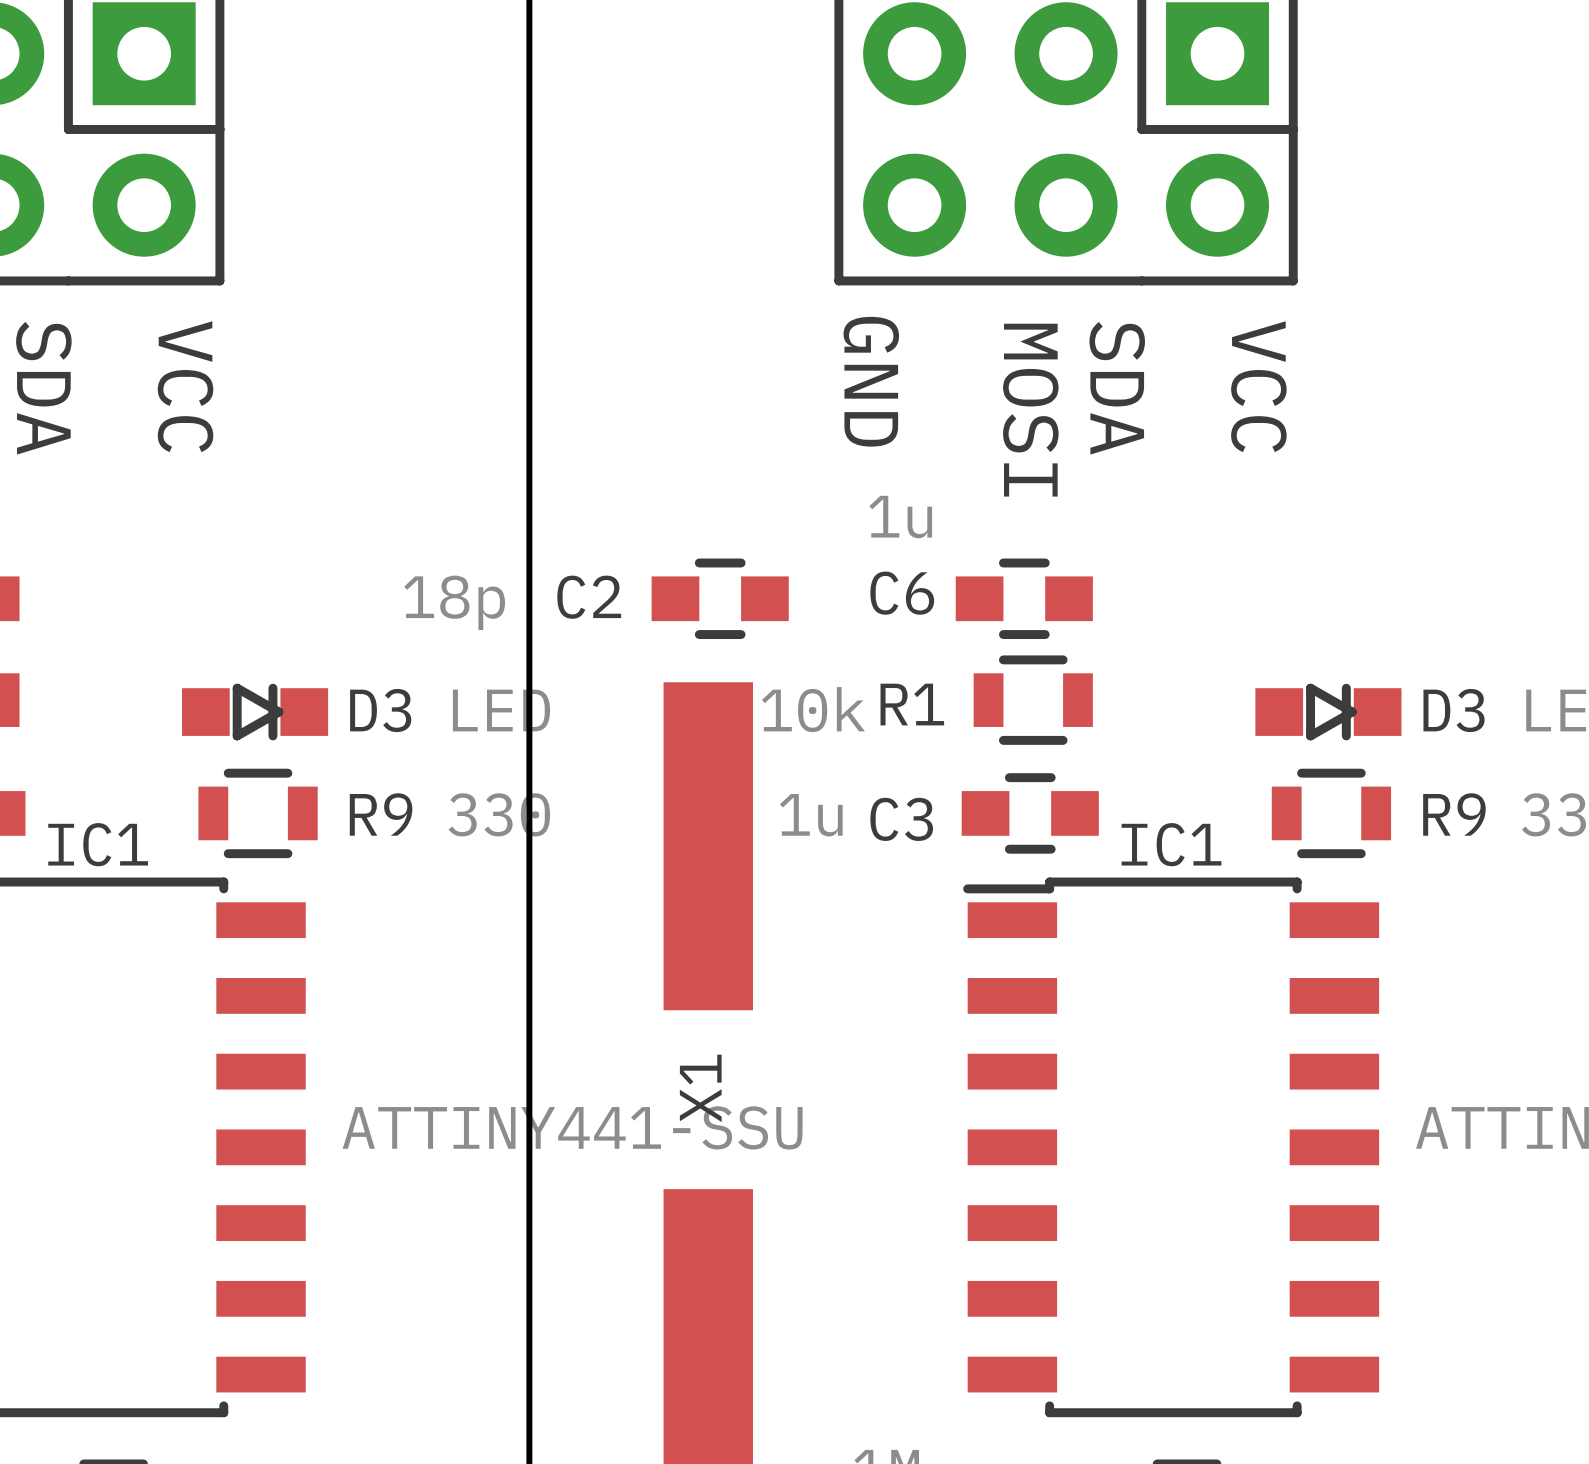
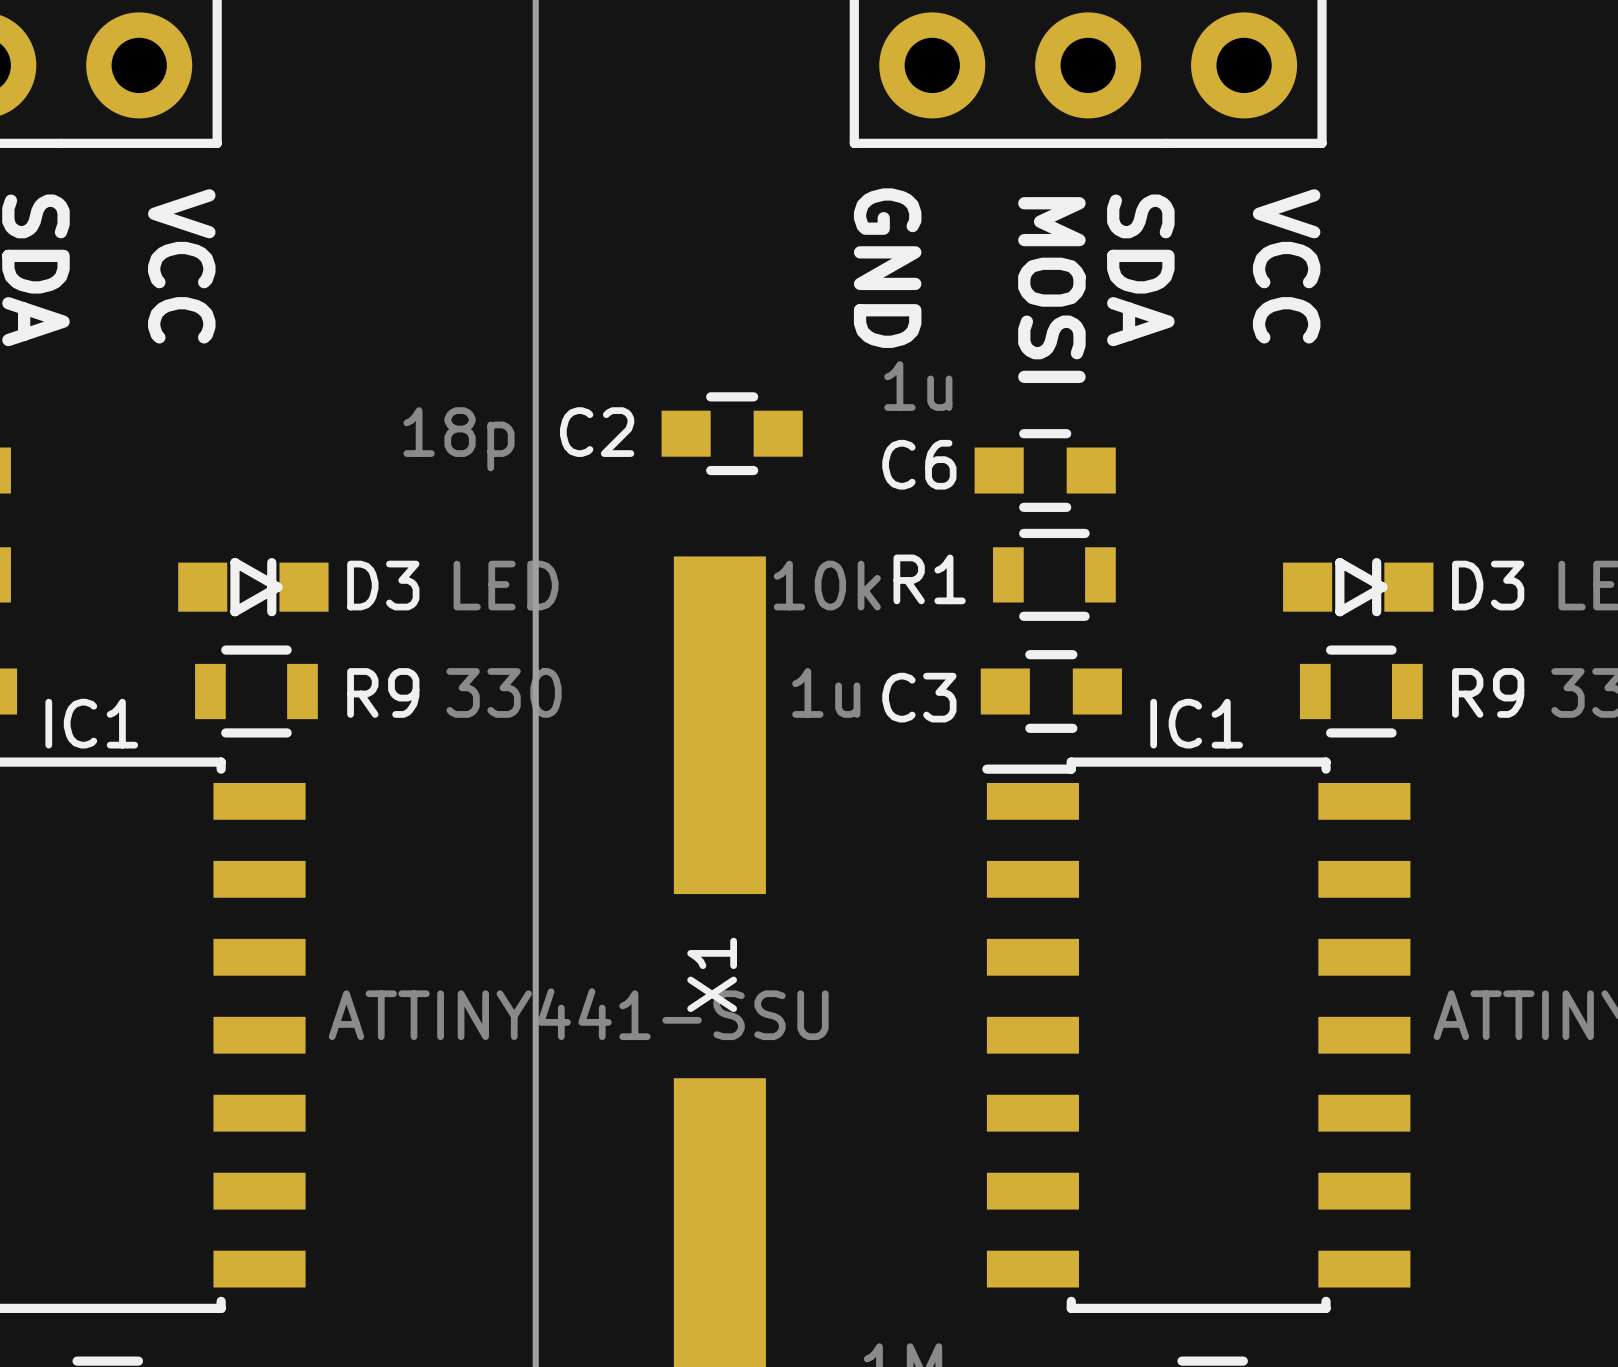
C2 position: (720, 598) -> (732, 433)

